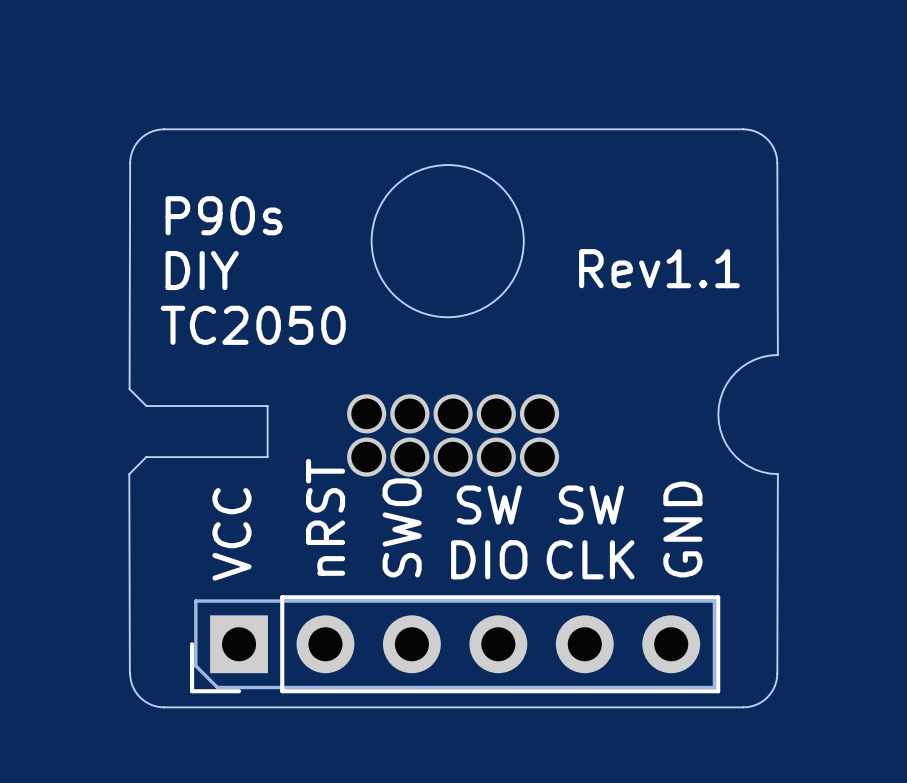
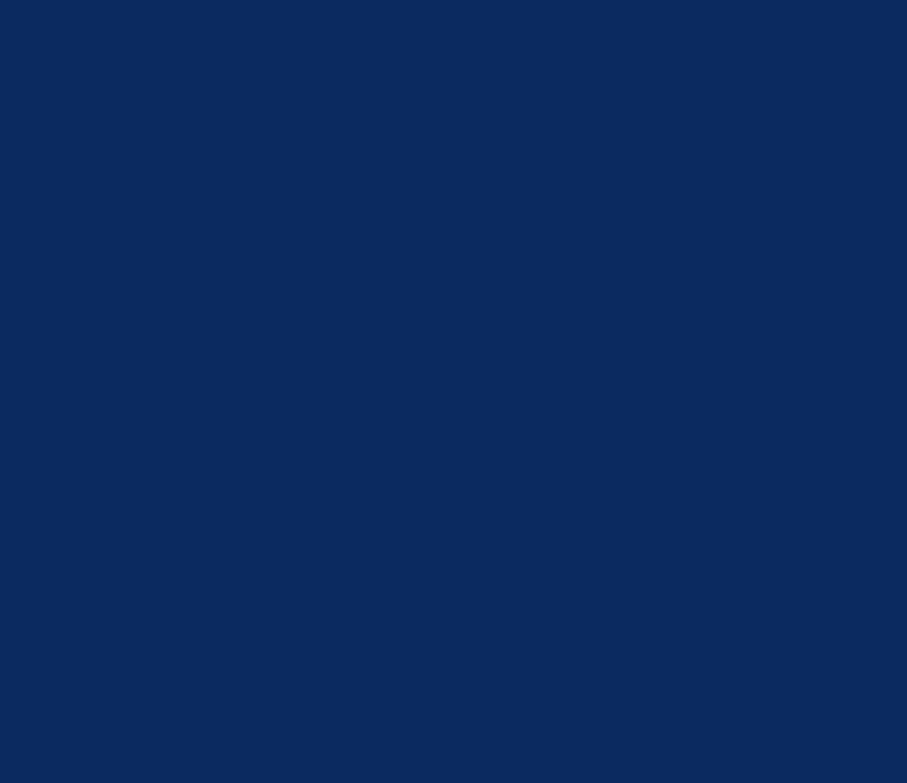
round board edge: [370, 164, 525, 319] -> none
text: P90s (224, 215) -> none
text: Rev1.1 (659, 268) -> none
text: DIY (202, 270) -> none
text: TC2050 (253, 325) -> none
part: (453, 435) -> none
text: SW (489, 505) -> none
text: SW (591, 505) -> none
text: nRST (325, 517) -> none
text: SWO (402, 527) -> none
text: GND (682, 529) -> none
text: VCC (231, 534) -> none
text: DIO (489, 559) -> none
text: CLK (590, 559) -> none
part: (455, 644) -> none
board edge: (129, 673) (129, 474) (146, 457) (267, 457) (267, 406) (146, 406) (129, 389) (130, 163) (133, 148) (142, 136) (152, 131) (164, 129) (743, 129) (758, 132) (769, 142) (775, 152) (777, 163) (777, 355) (755, 359) (735, 372) (722, 391) (718, 414) (722, 437) (735, 456) (755, 469) (777, 474) (777, 677) (772, 691) (764, 699) (754, 705) (743, 707) (164, 707) (149, 703) (140, 697) (132, 684) (130, 673) -> none

